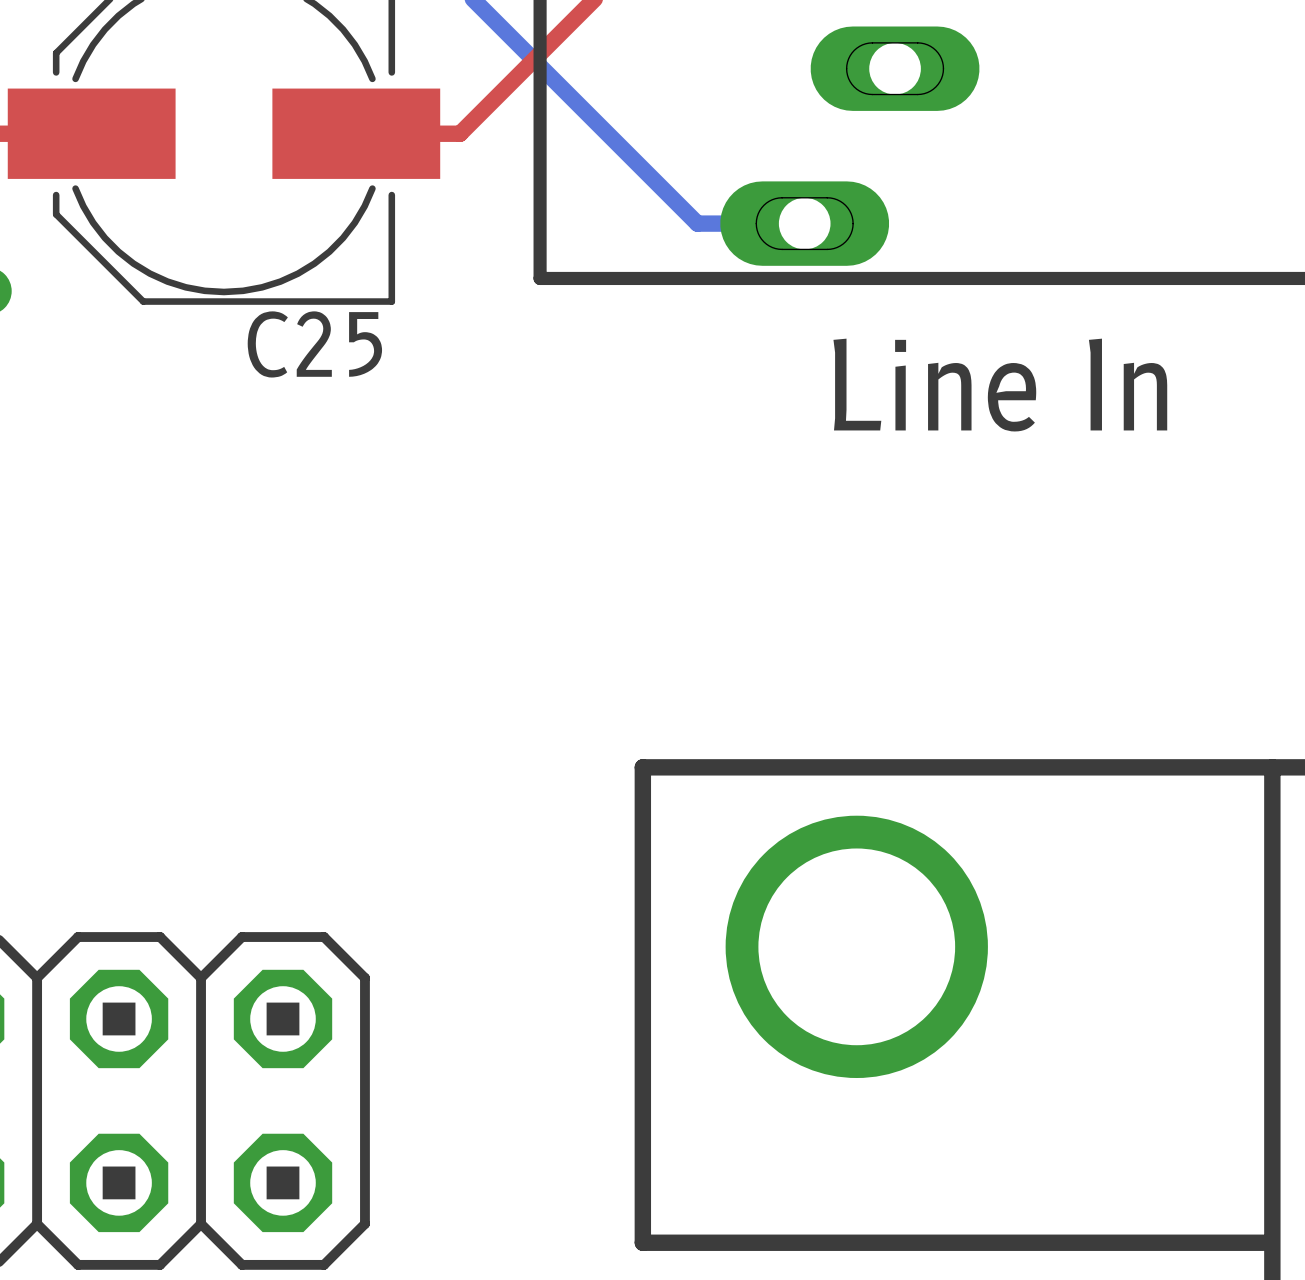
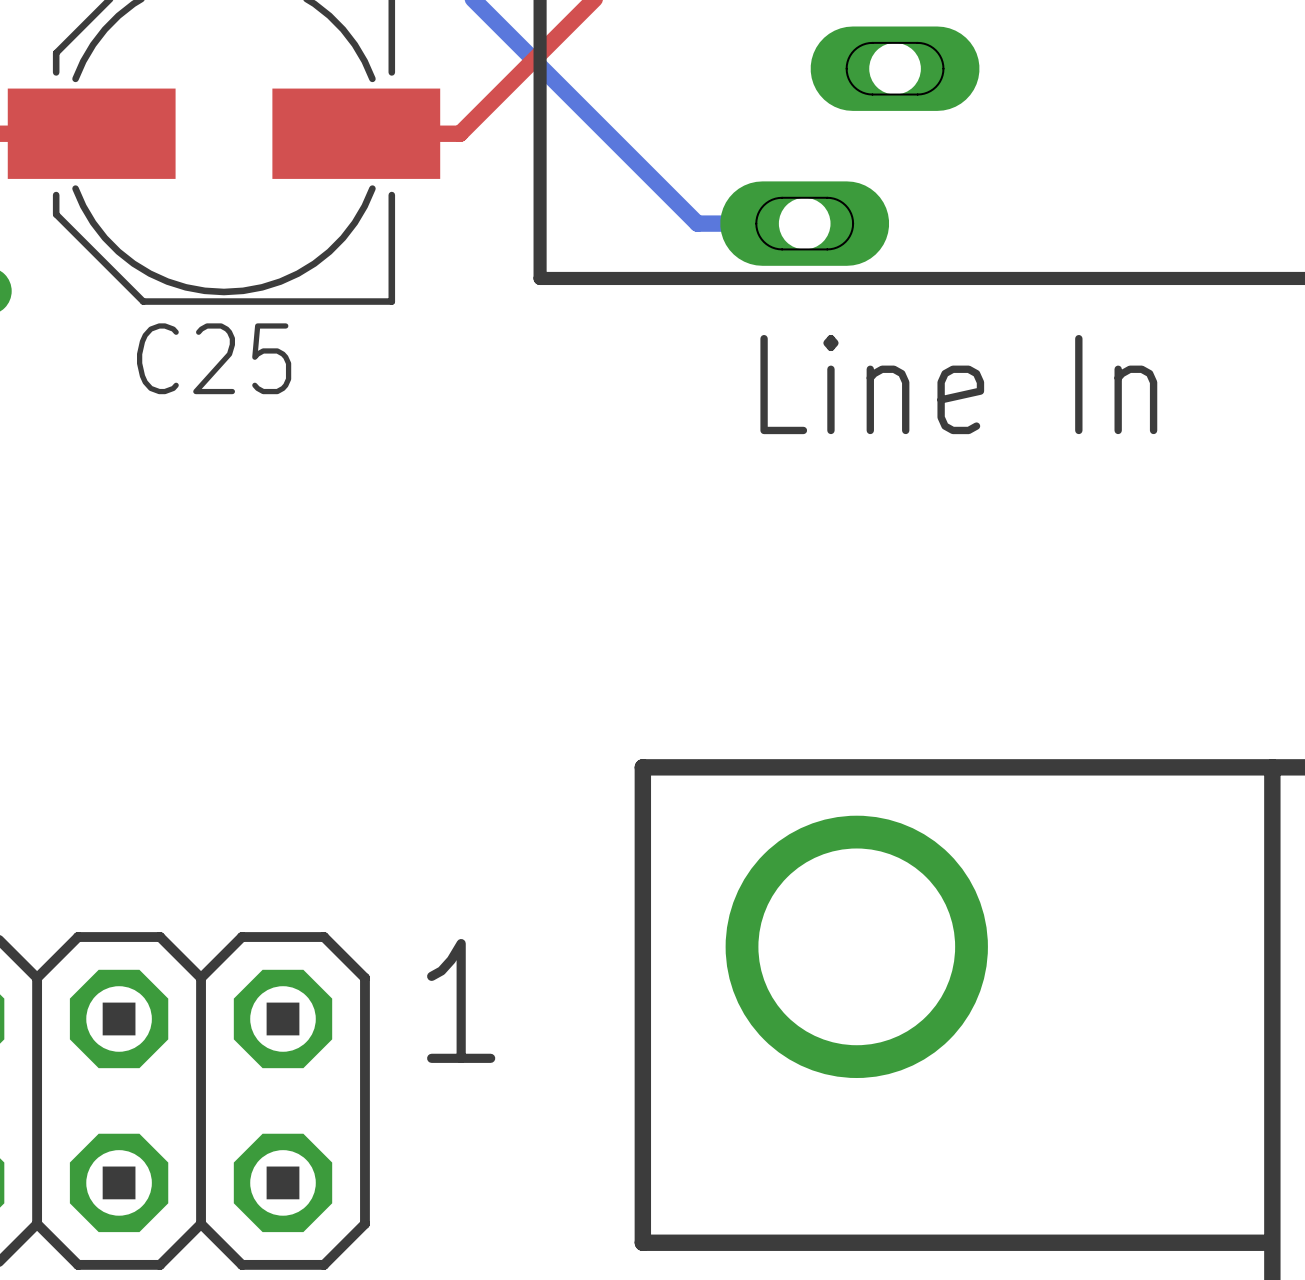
C25 name position: C25 (314, 344) -> C25 (214, 358)
text: none -> 1 (461, 1000)

